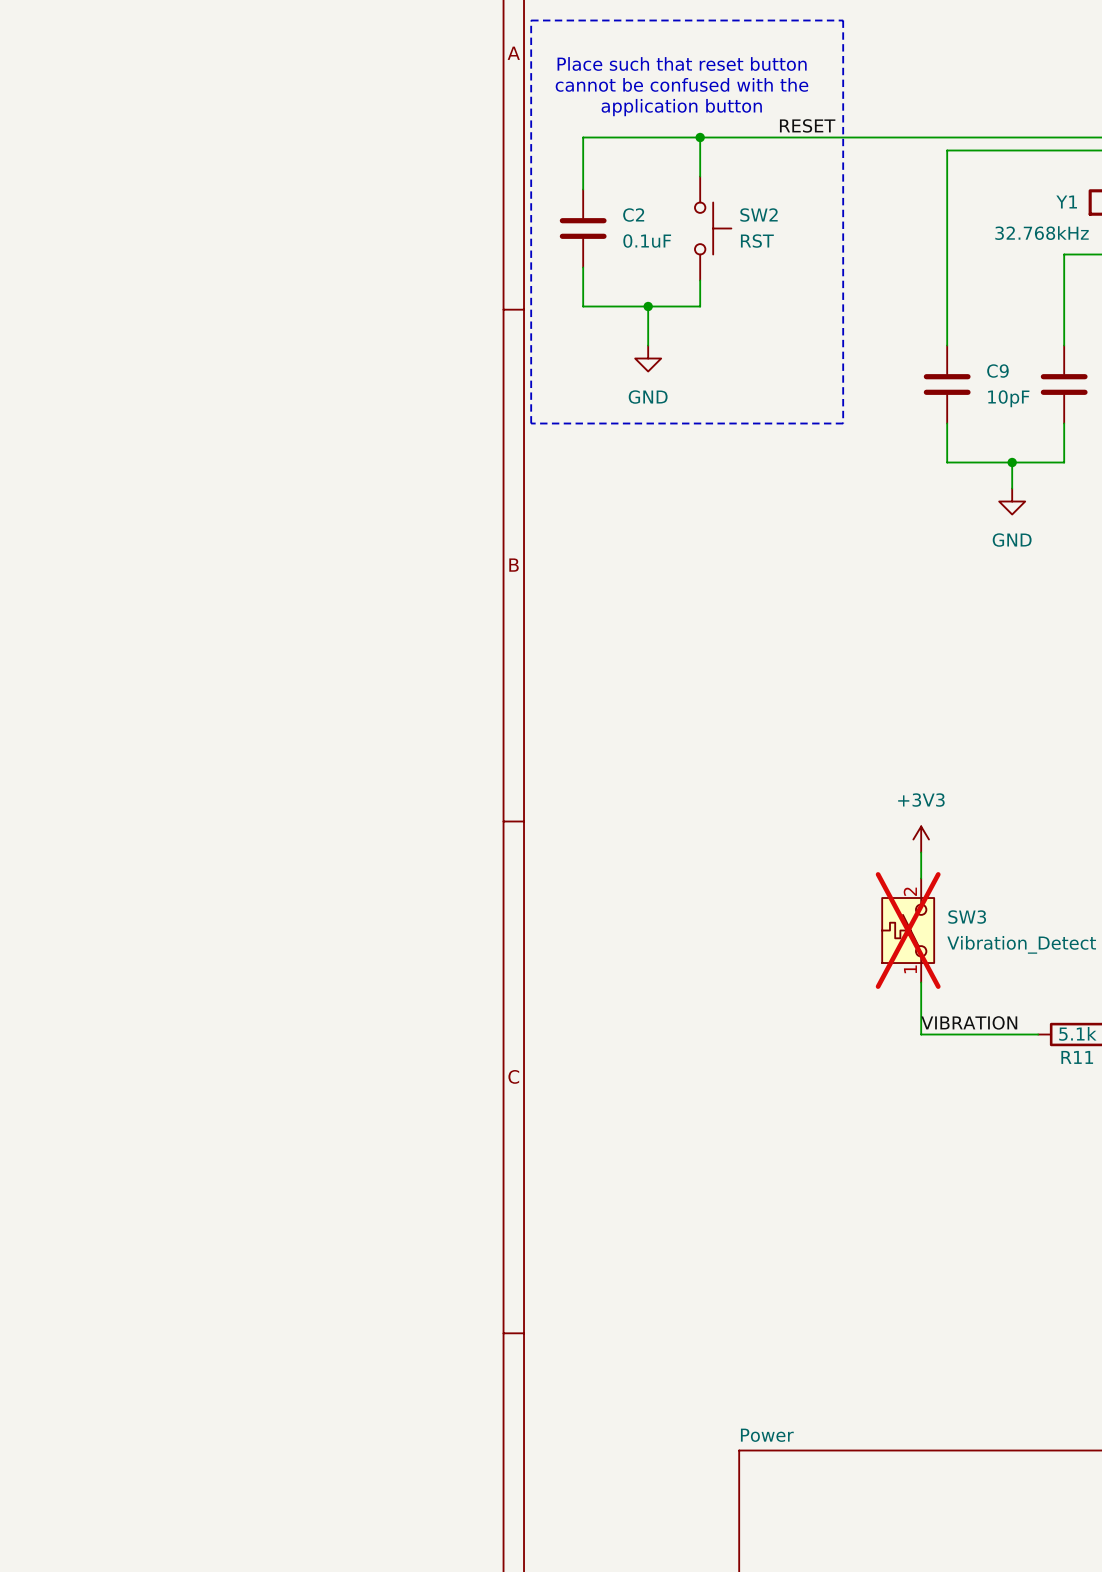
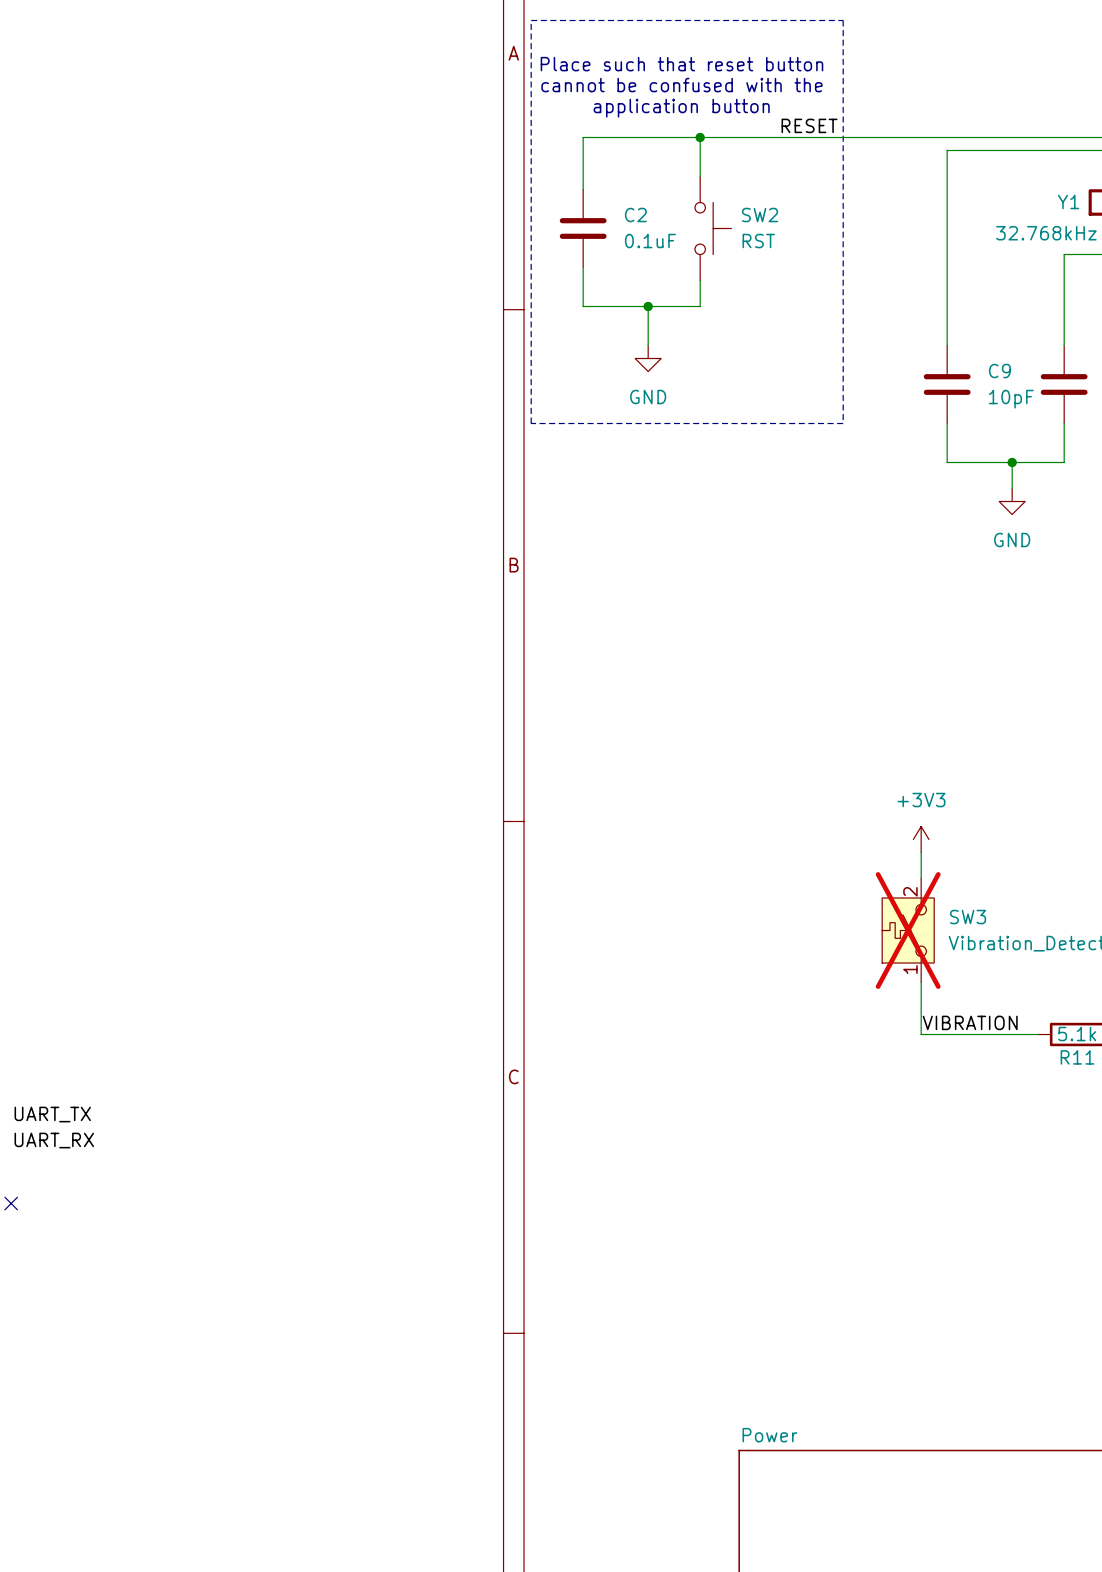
label: none -> UART_TX (52, 1114)
label: none -> UART_RX (54, 1140)
no-connect mark: none -> (11, 1203)

